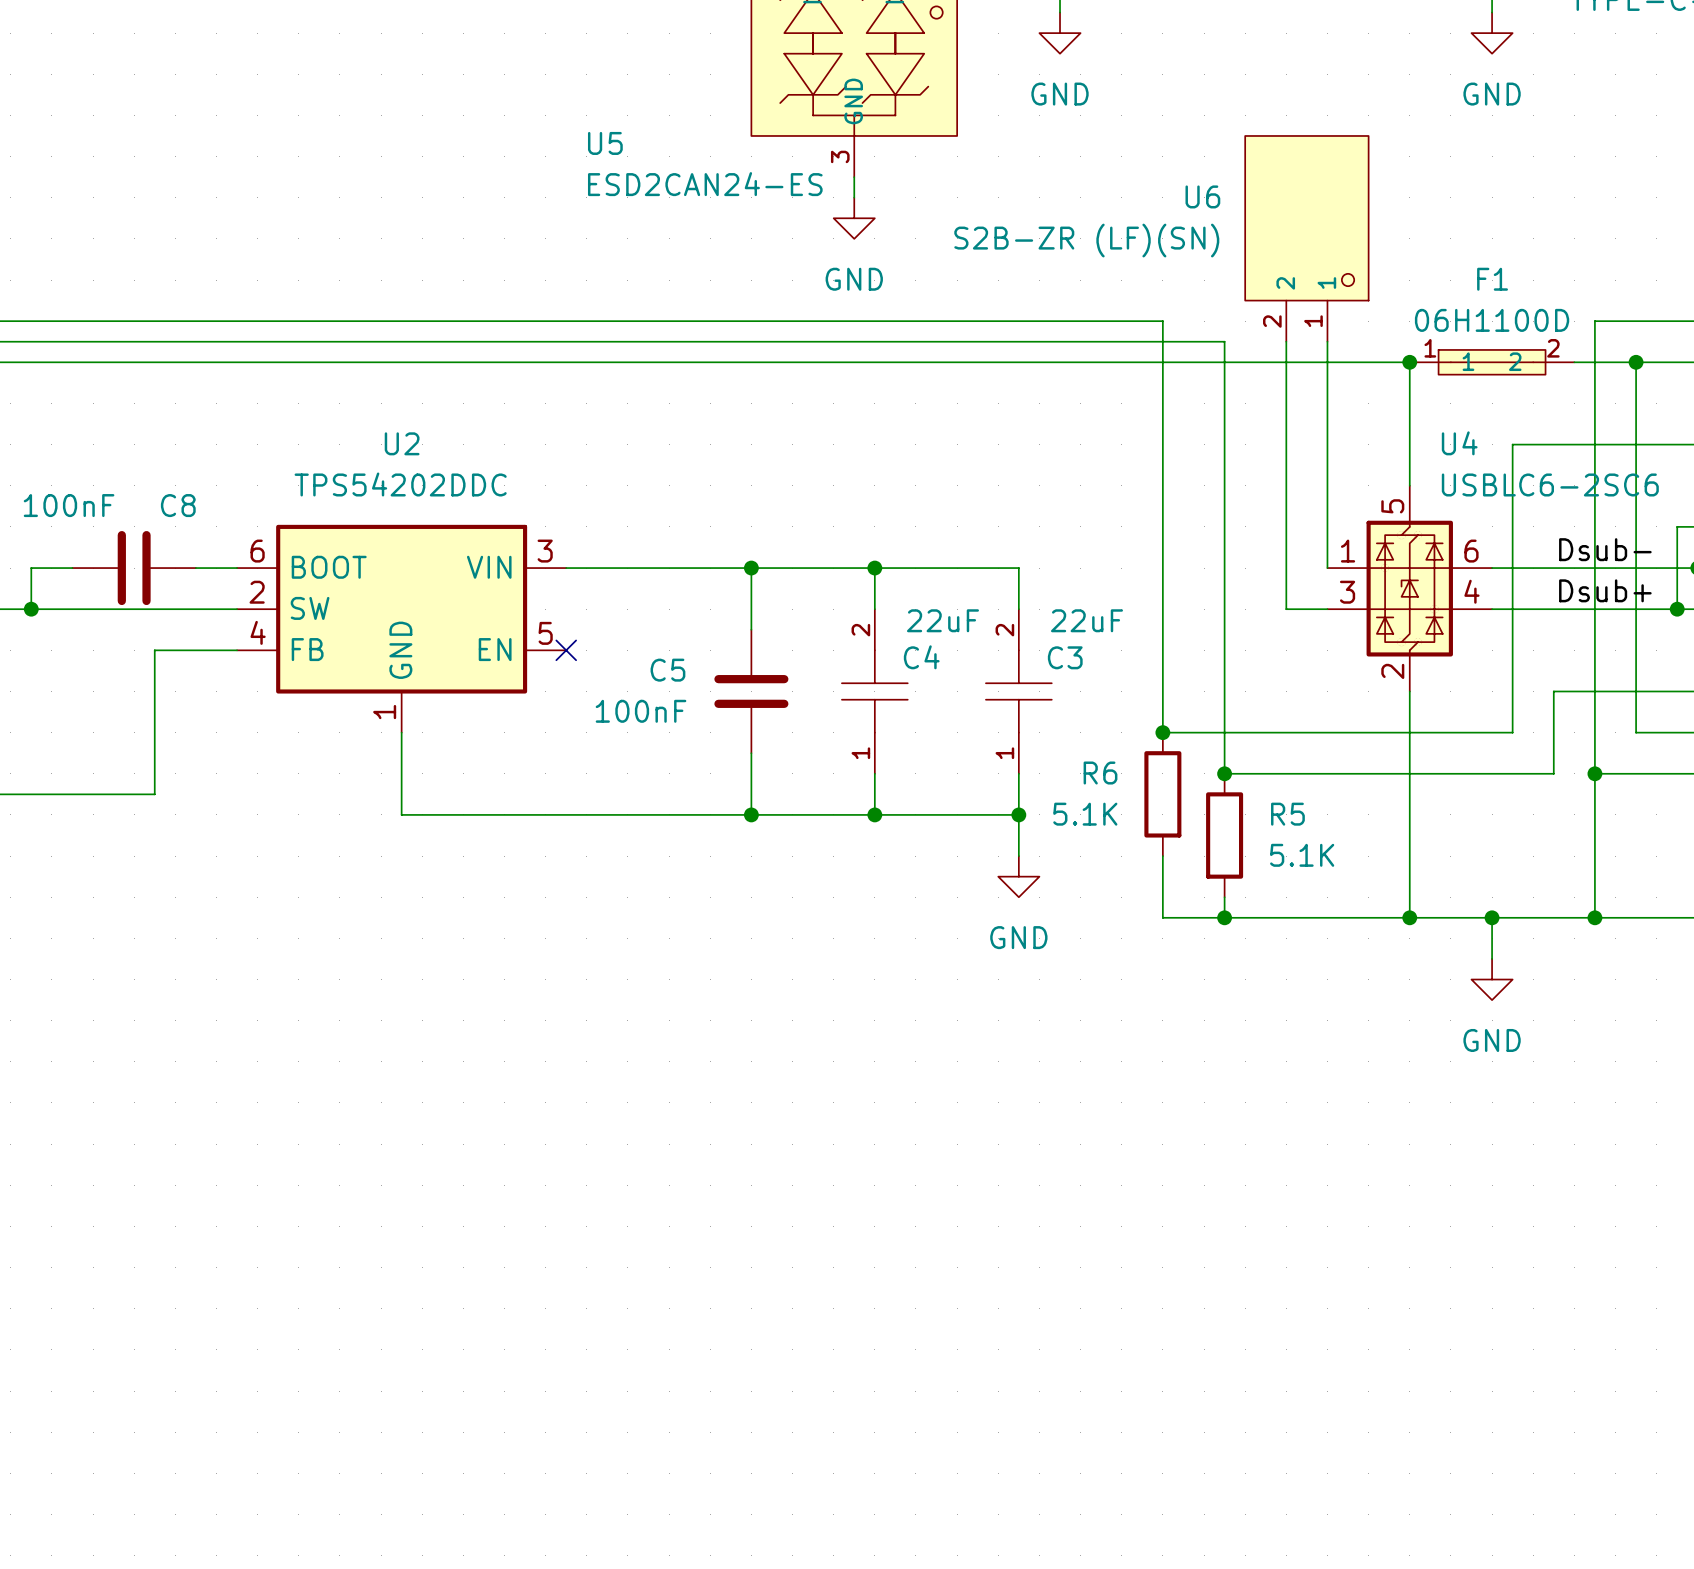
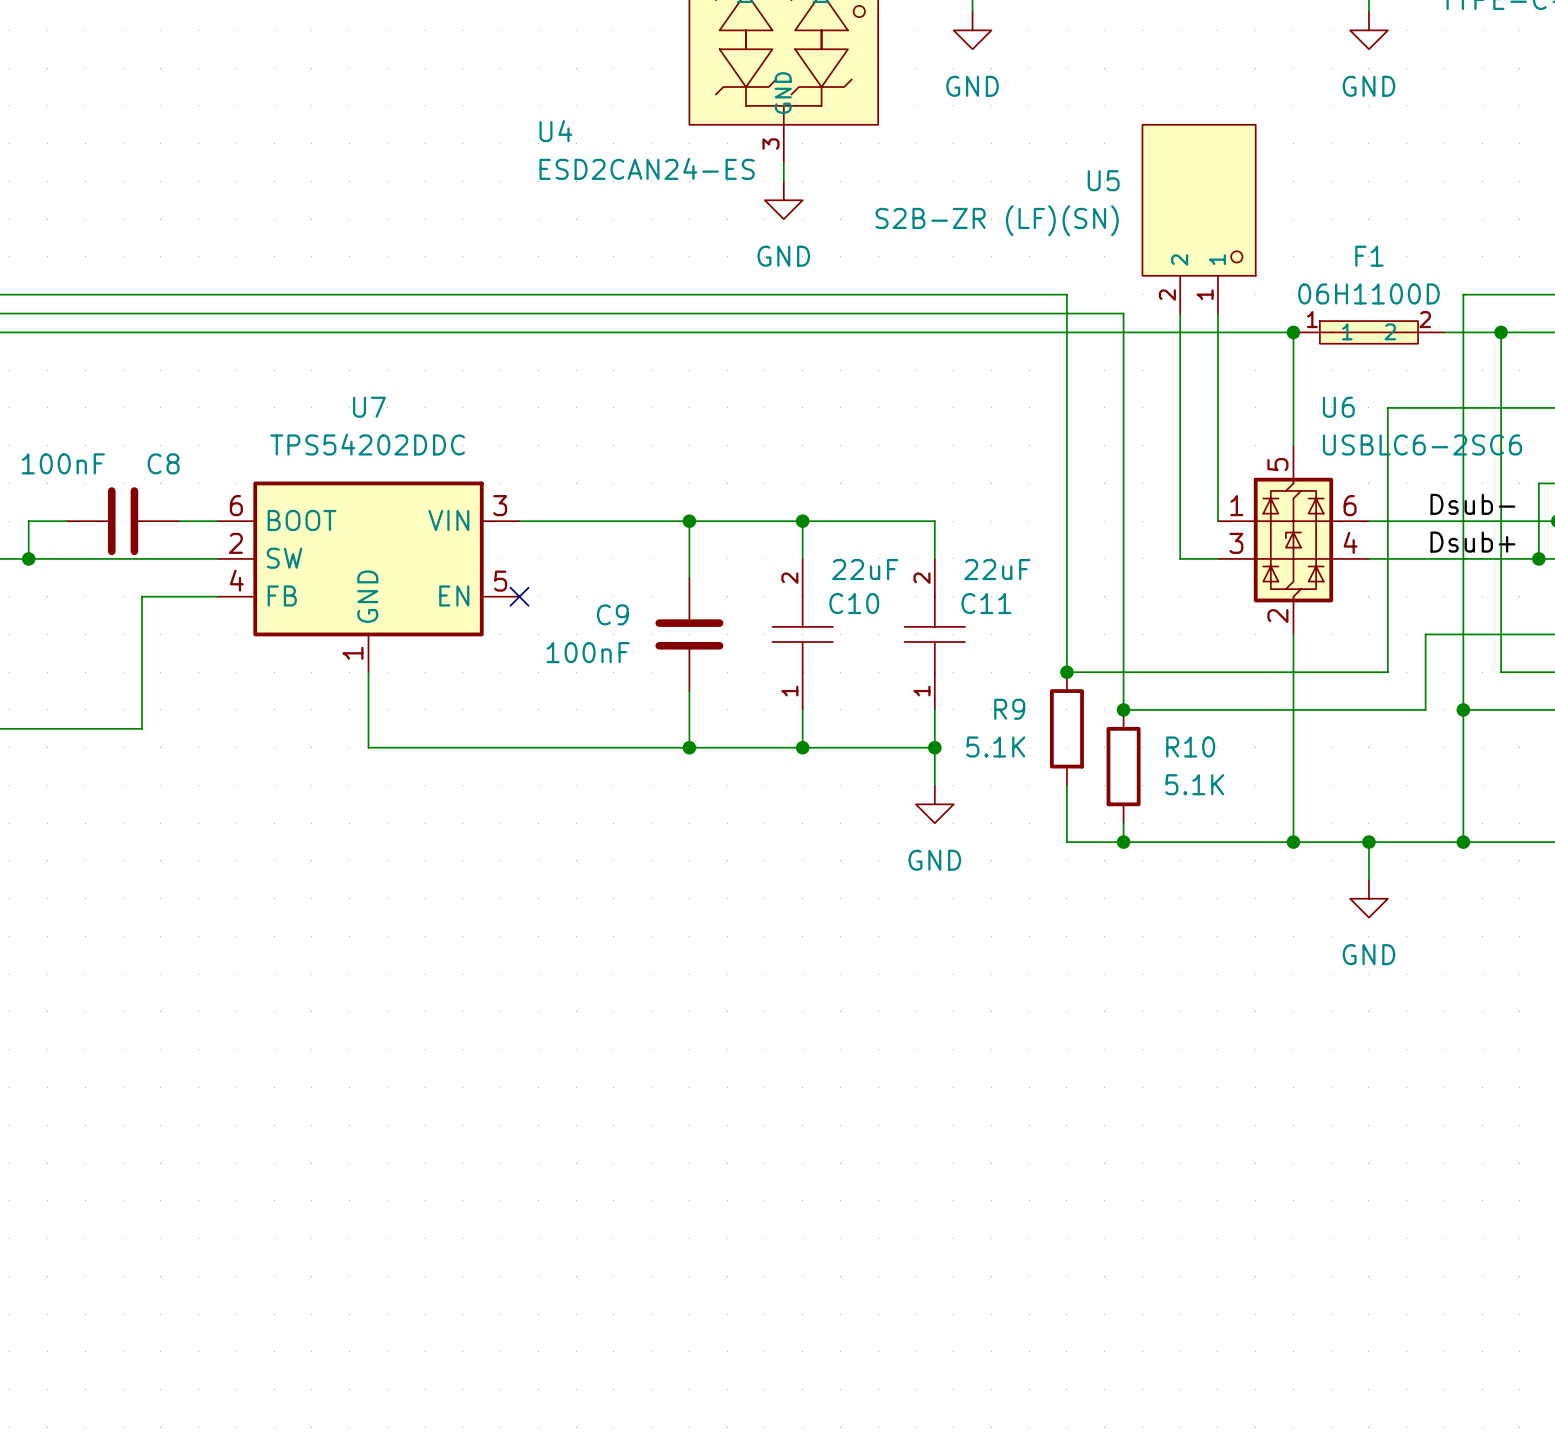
U5 name: U5 (605, 143) -> U4 (555, 131)
U6 name: U6 (1202, 196) -> U5 (1103, 180)
U2 name: U2 (402, 443) -> U7 (369, 407)
U4 name: U4 (1459, 443) -> U6 (1338, 407)
C4 name: C4 (921, 657) -> C10 (854, 603)
C3 name: C3 (1065, 657) -> C11 (986, 603)
C5 name: C5 (667, 670) -> C9 (612, 614)
R6 name: R6 (1100, 773) -> R9 (1009, 709)
R5 name: R5 (1287, 814) -> R10 (1190, 747)

